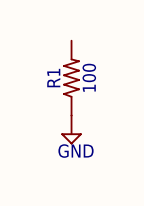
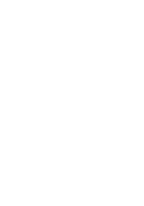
R1: 100 (71, 78) -> none
power symbol: GND (71, 129) -> none

